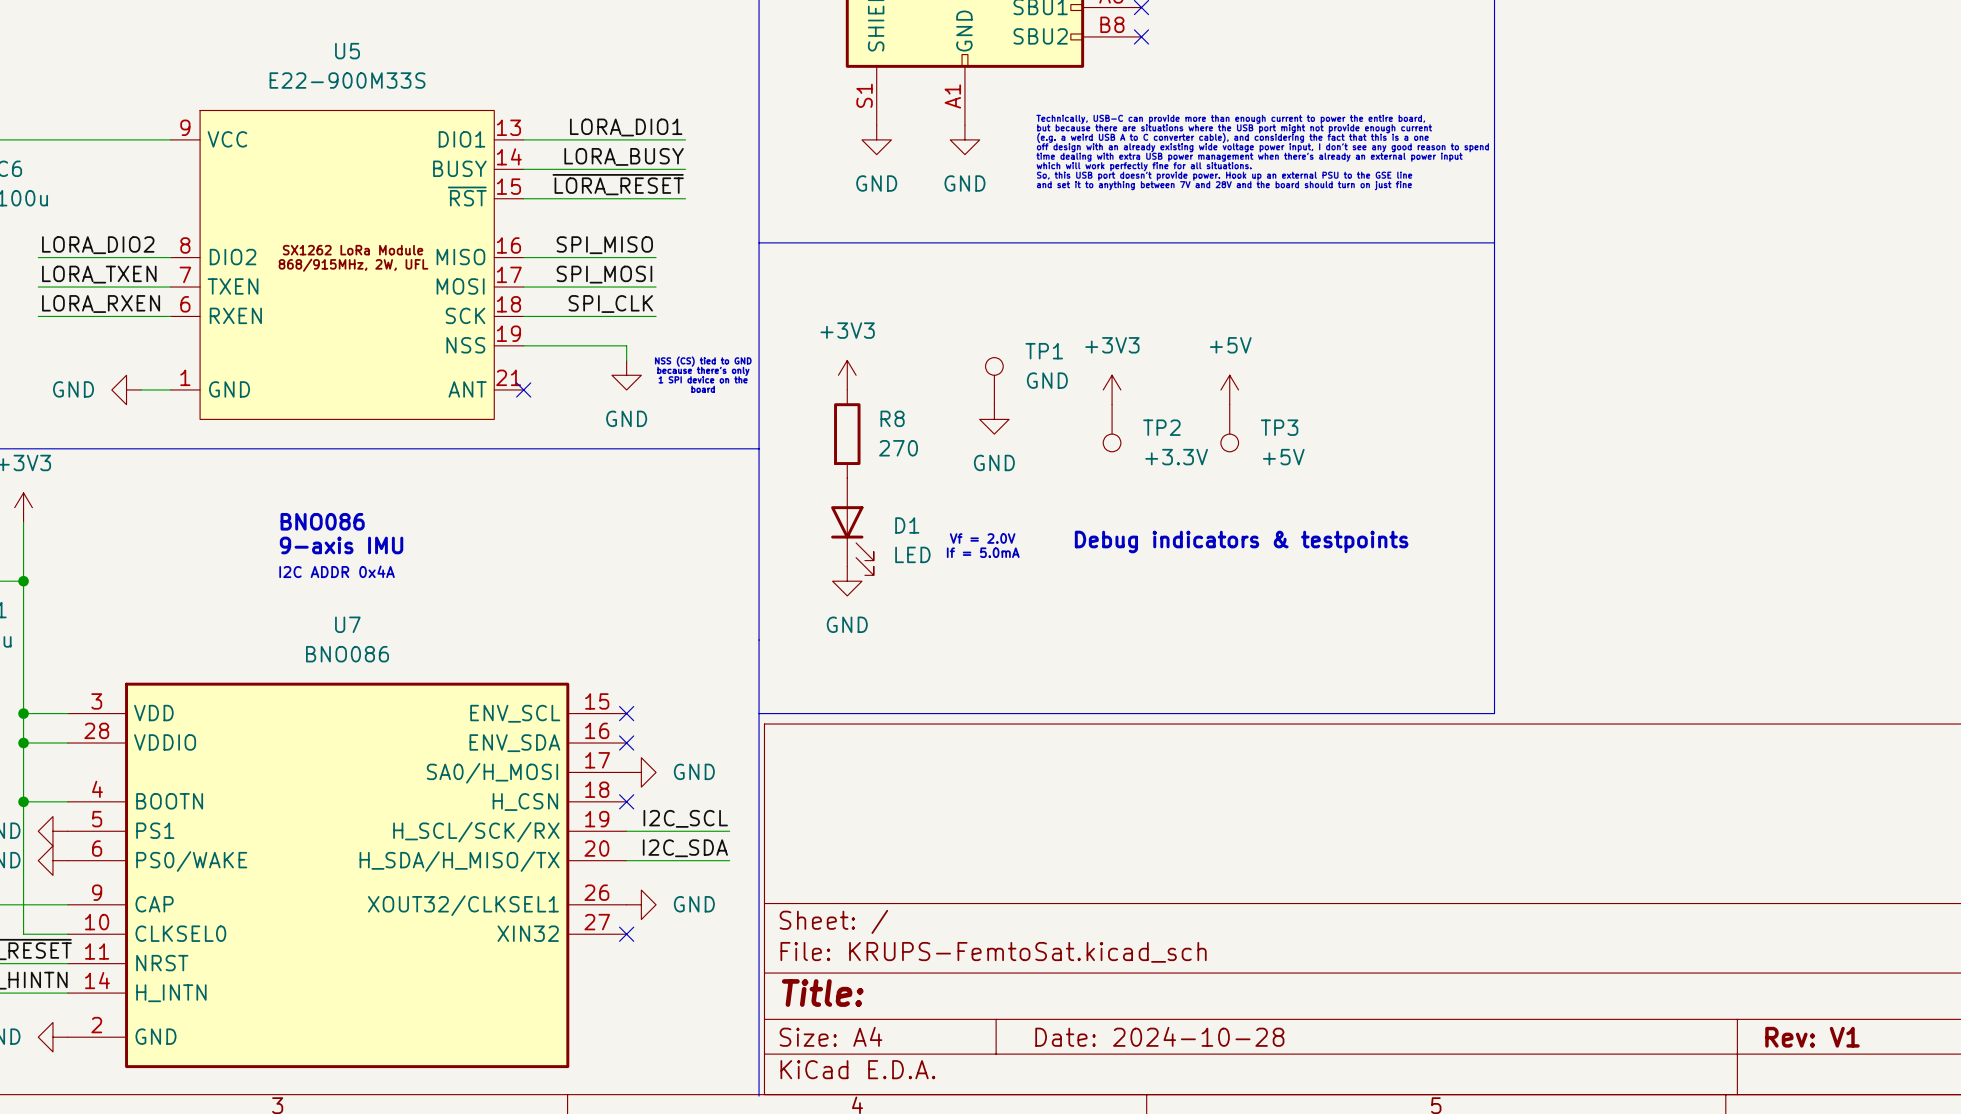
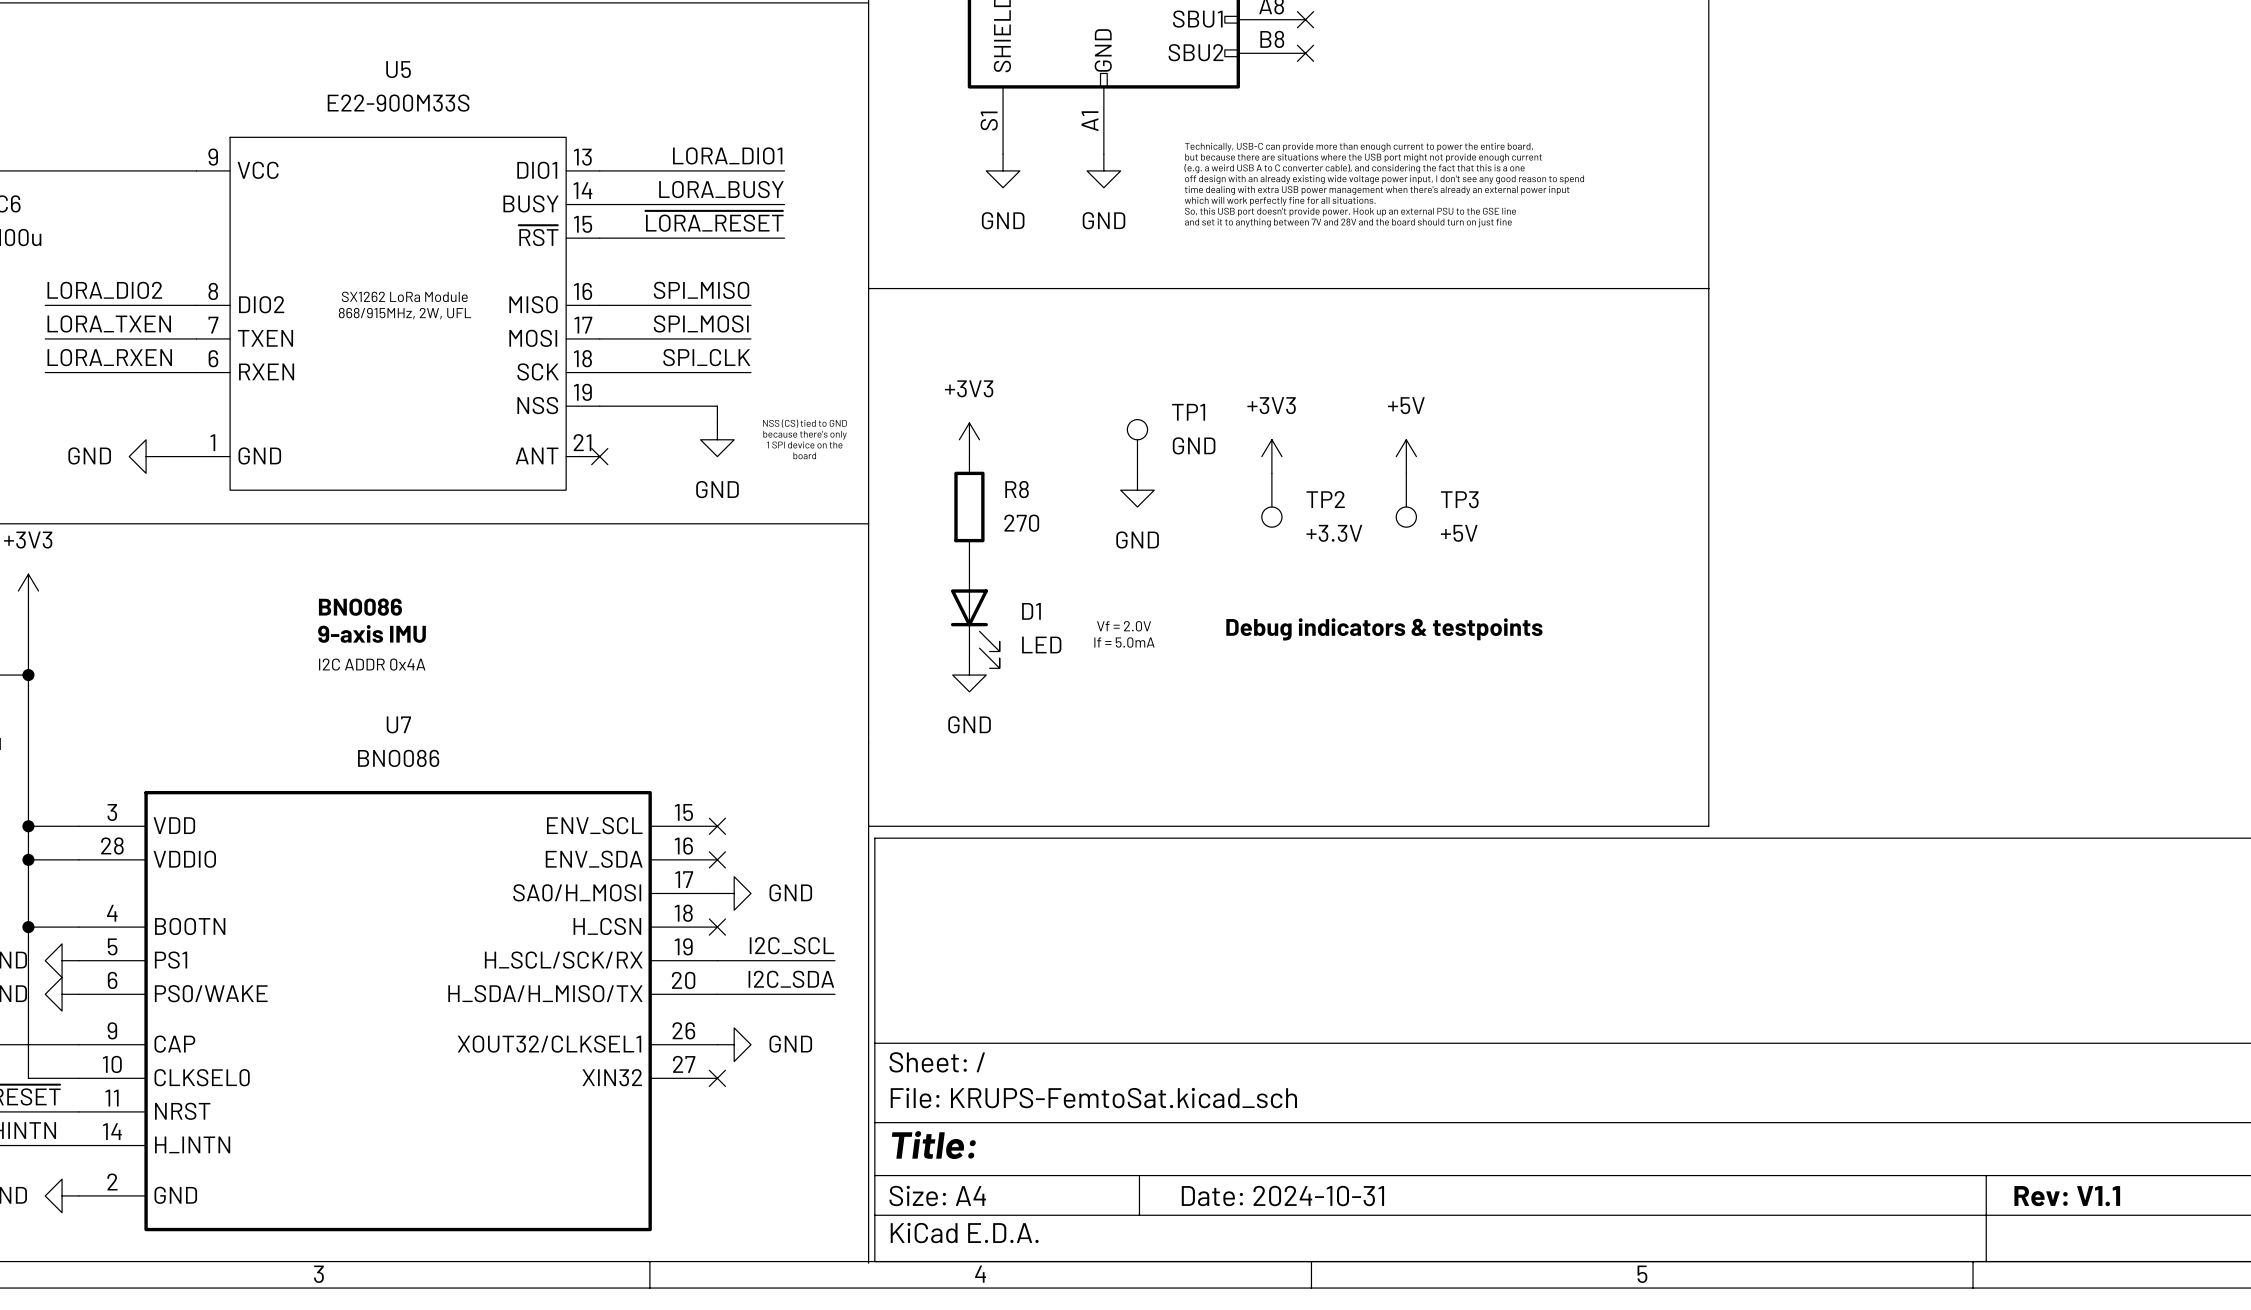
title block: Date: 2024-10-28 (1159, 1036) -> Date: 2024-10-31 (1282, 1196)
title block: Rev: V1 (1812, 1037) -> Rev: V1.1 (2067, 1196)

